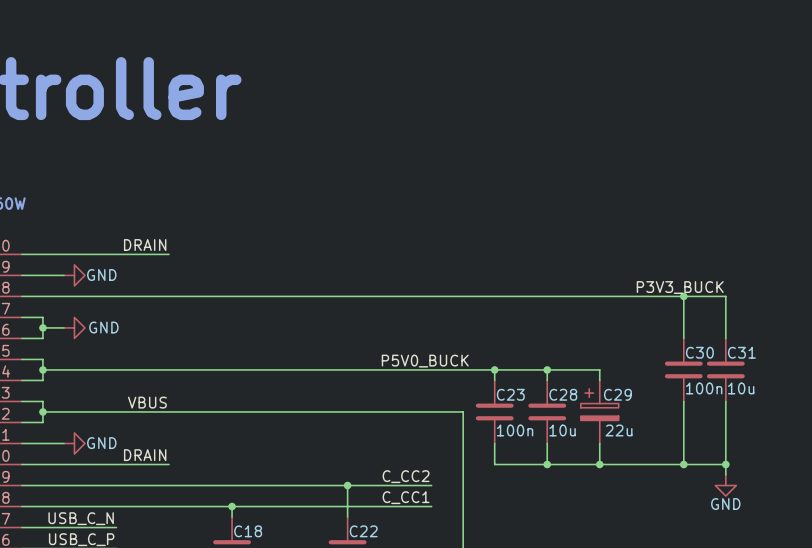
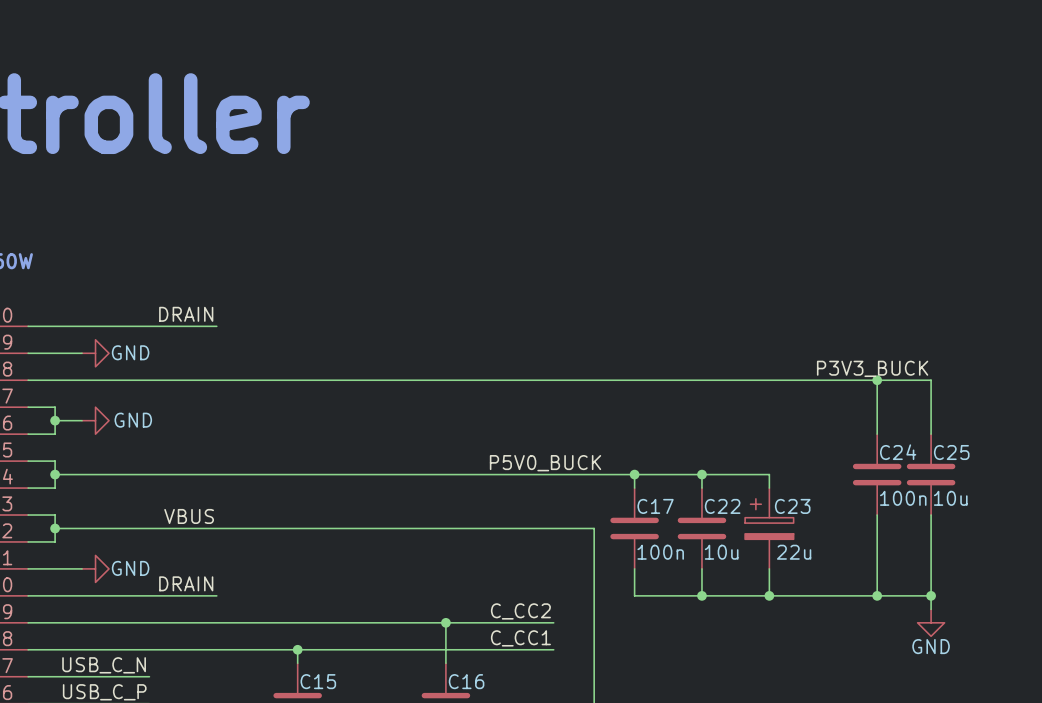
C30 name: C30 (699, 352) -> C24 (898, 452)
C31 name: C31 (741, 352) -> C25 (951, 452)
C23 name: C23 (510, 394) -> C17 (655, 506)
C28 name: C28 (563, 394) -> C22 (722, 506)
C29 name: C29 (617, 394) -> C23 (792, 506)
C18 name: C18 (248, 531) -> C15 (318, 681)
C22 name: C22 (363, 531) -> C16 (466, 681)

